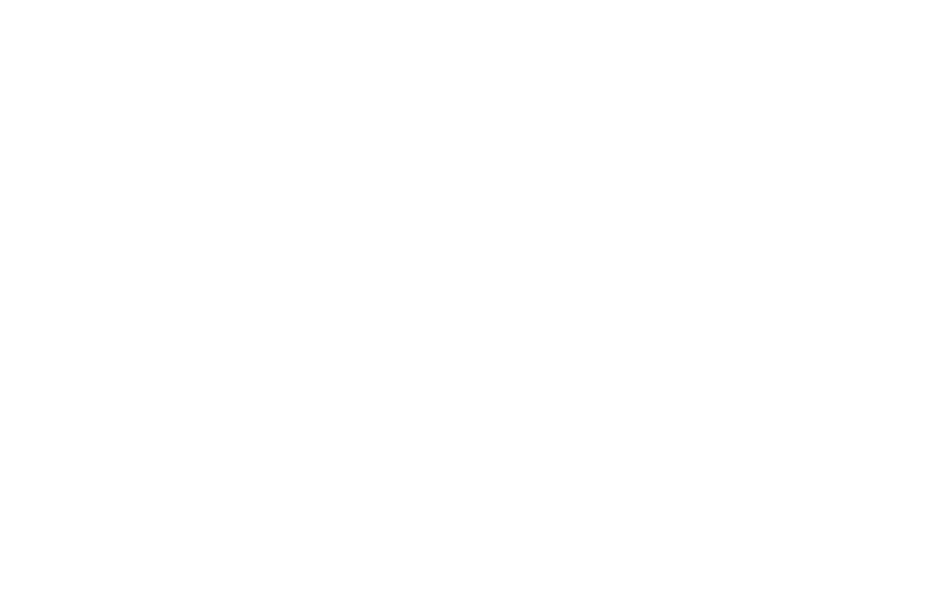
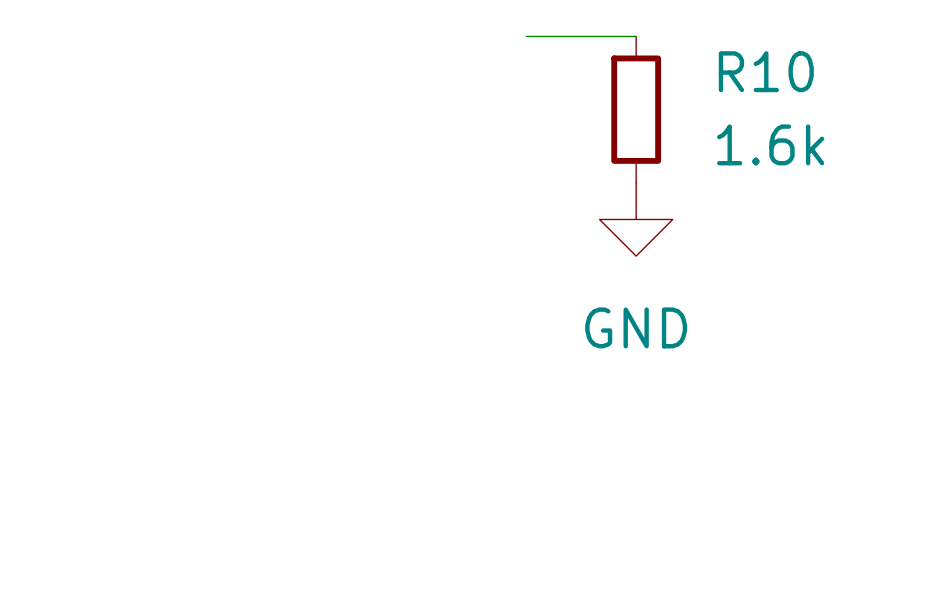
wire: none -> (526, 36) (636, 36)
R10: none -> 1.6k (636, 109)
power symbol: none -> GND (636, 219)

